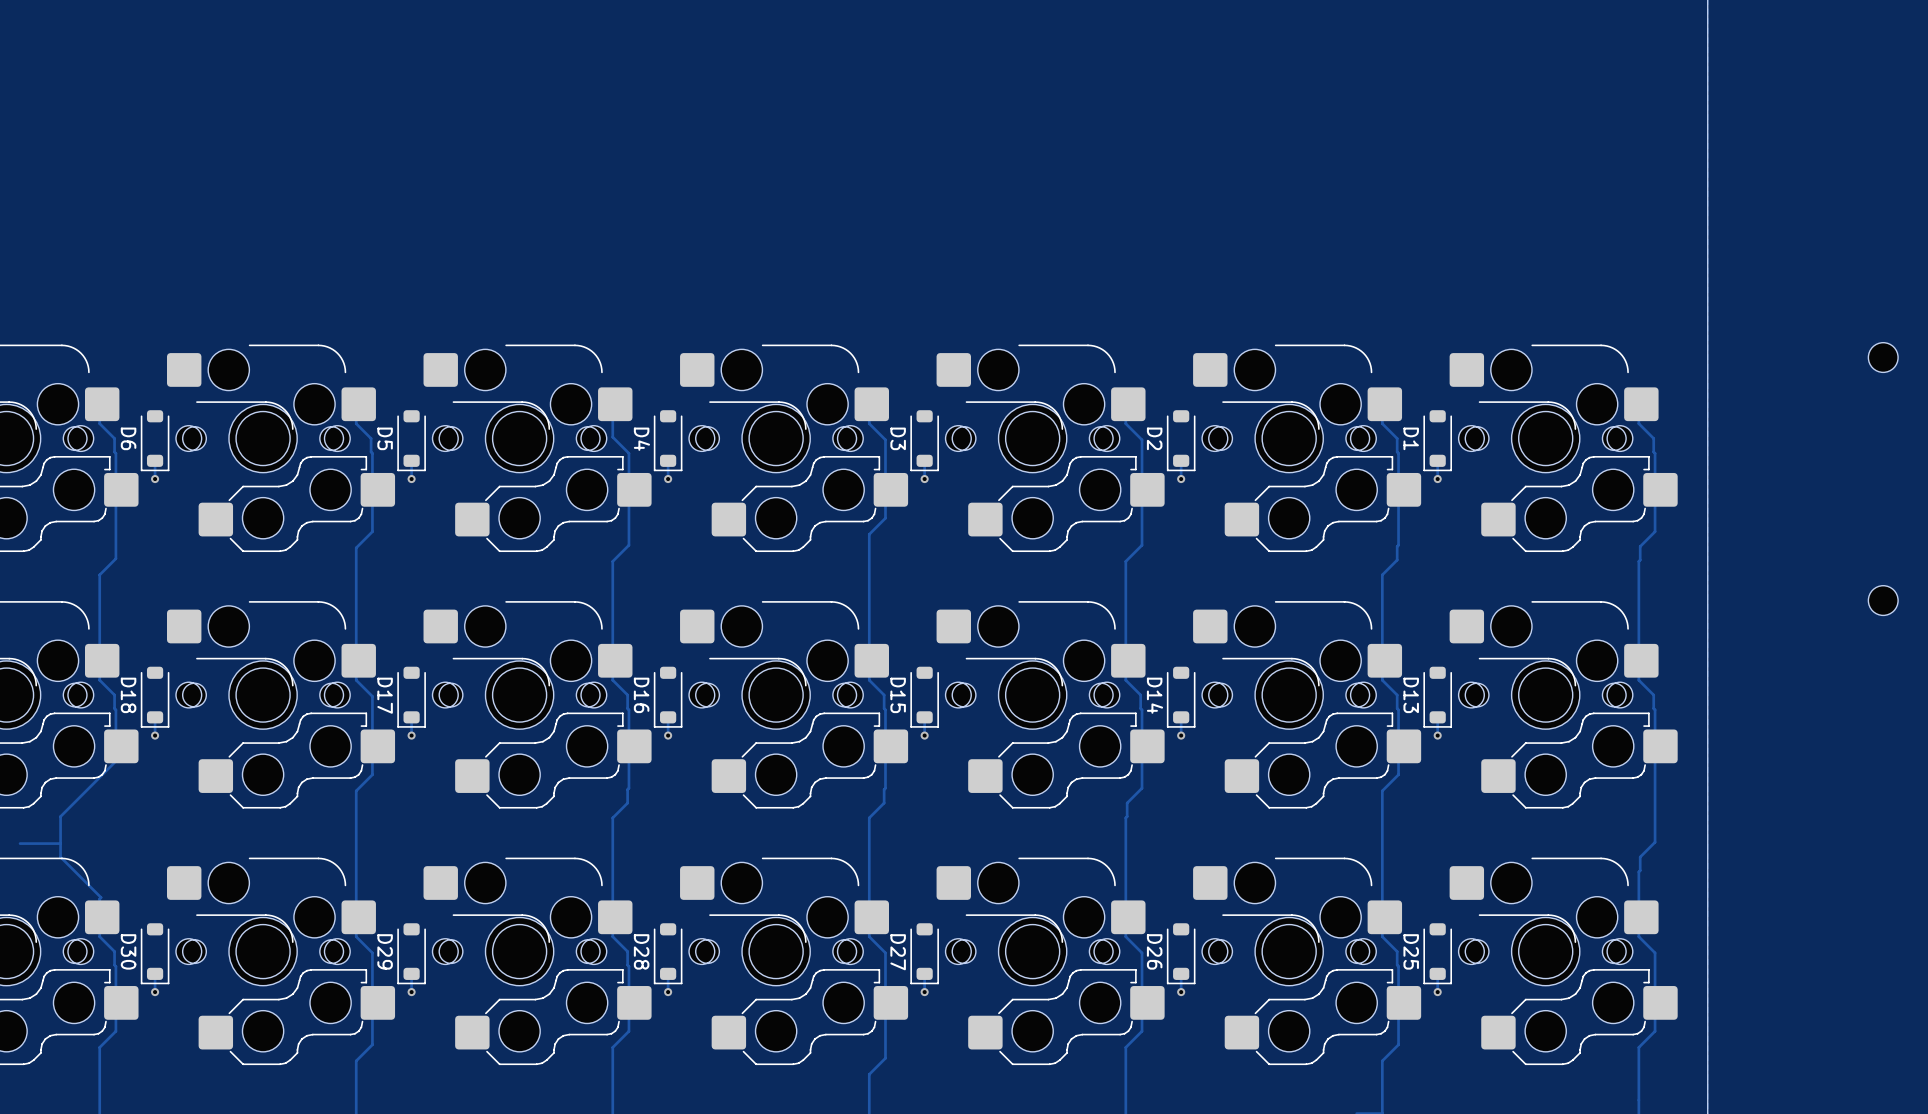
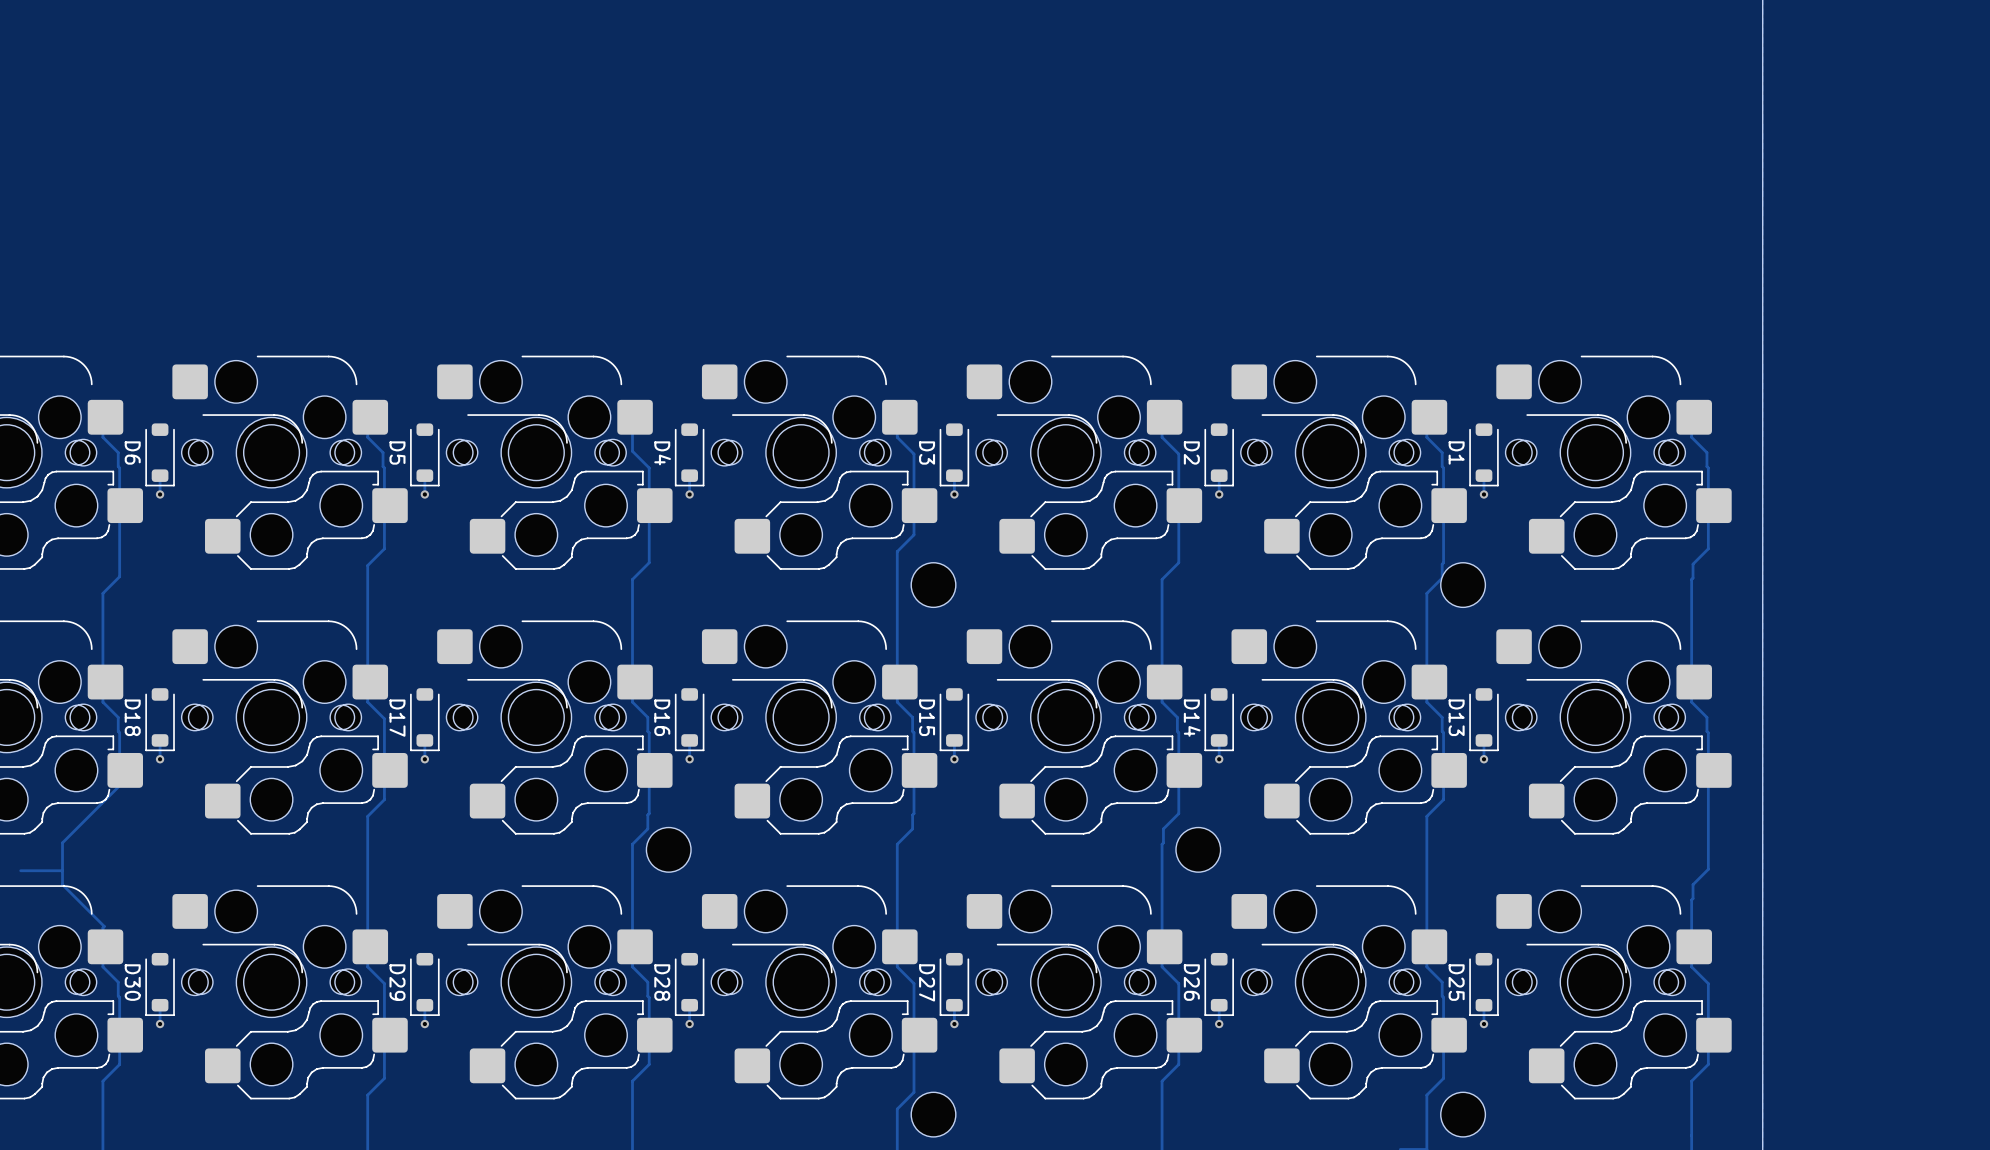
part: (1883, 357) -> none
part: none -> (933, 585)
part: none -> (1463, 585)
part: (1883, 600) -> none
part: none -> (668, 849)
part: none -> (1198, 849)
part: none -> (933, 1114)
part: none -> (1463, 1114)

